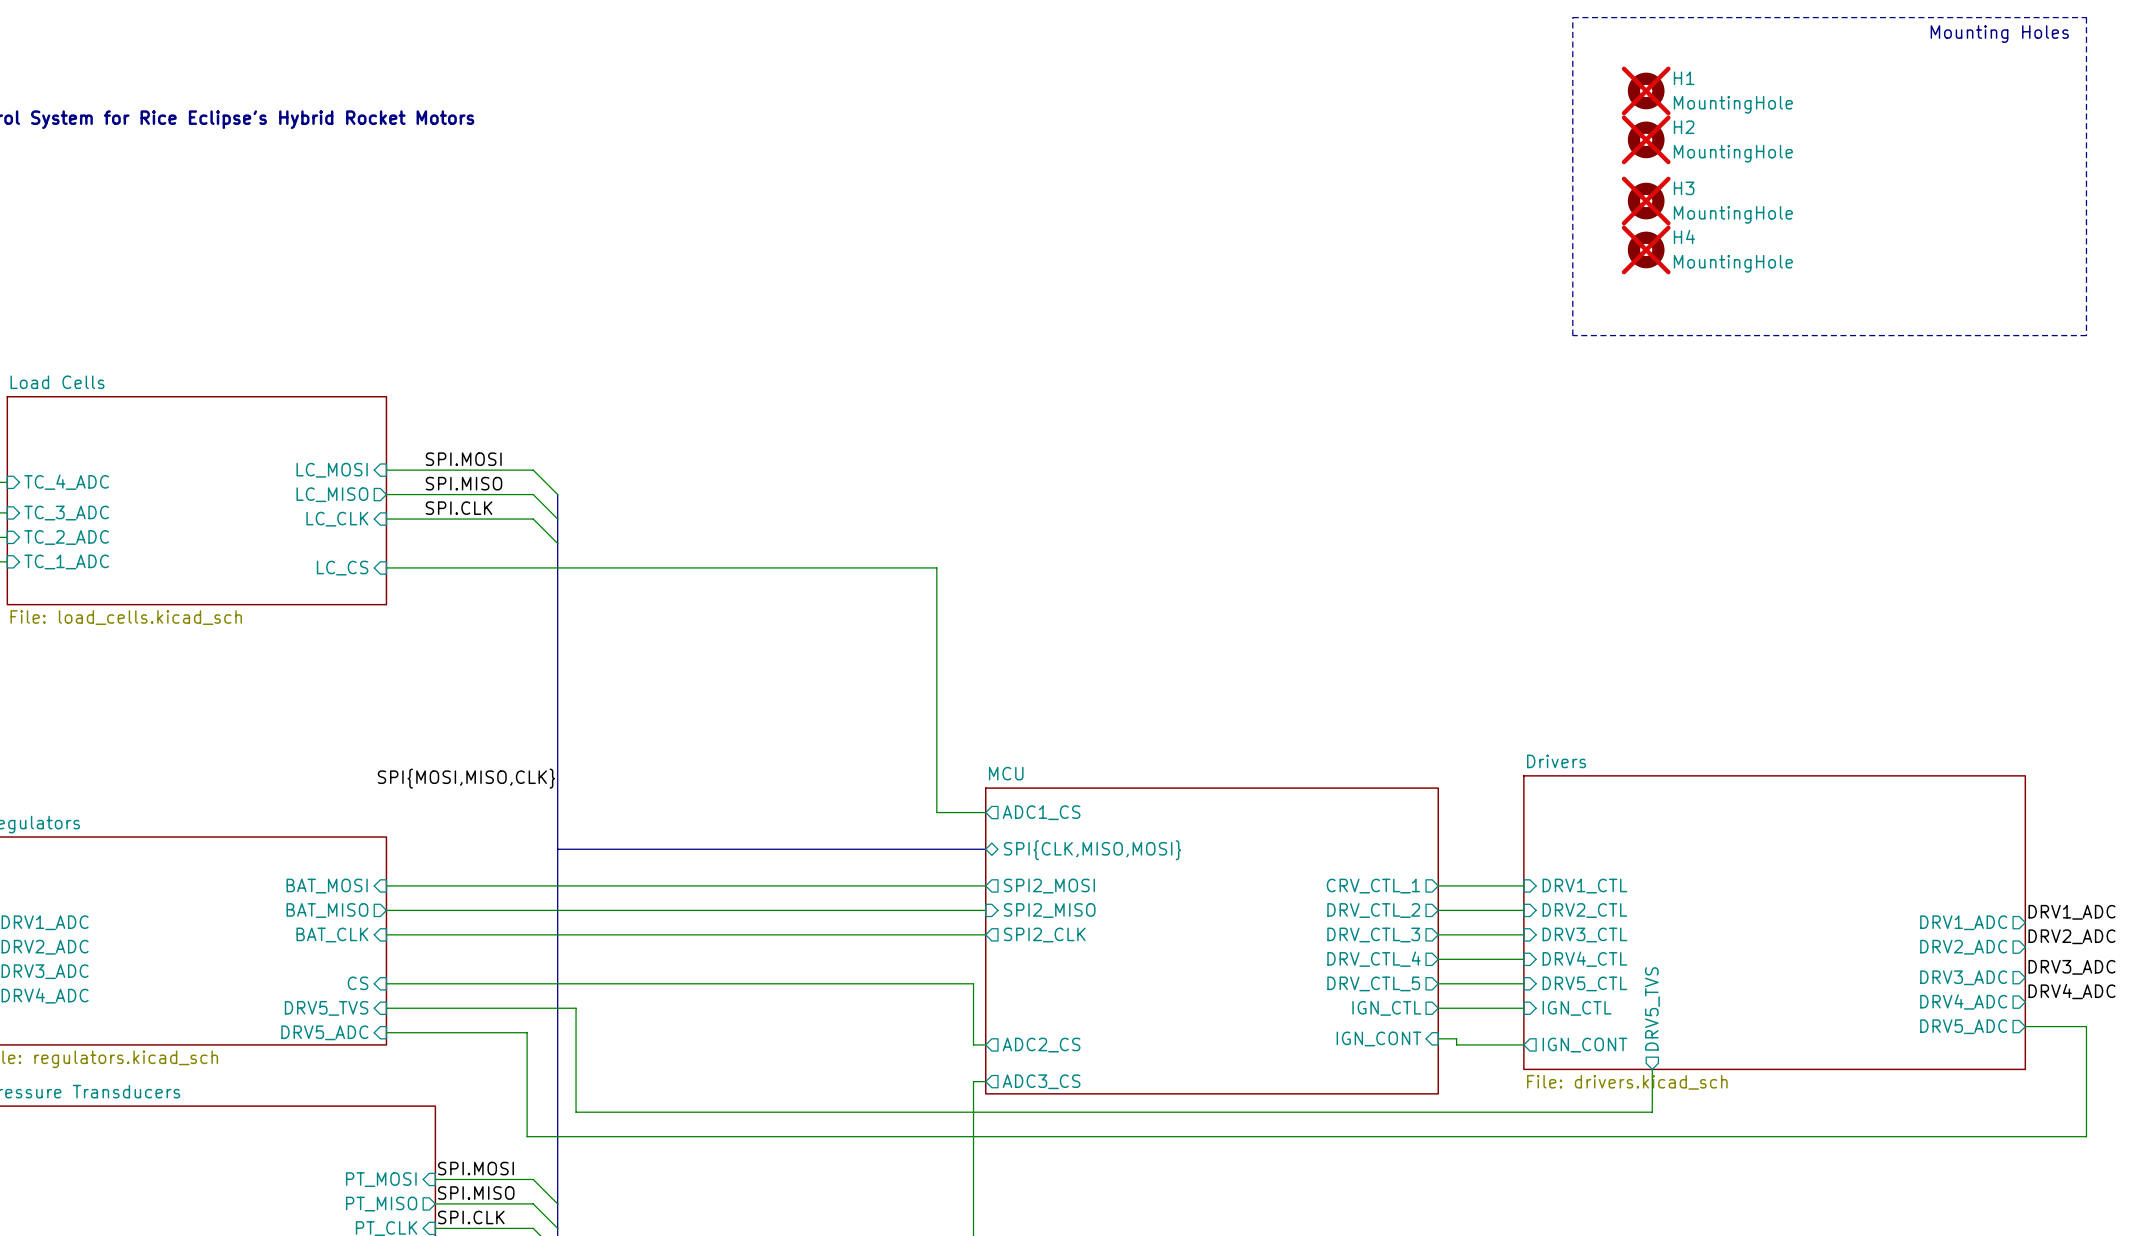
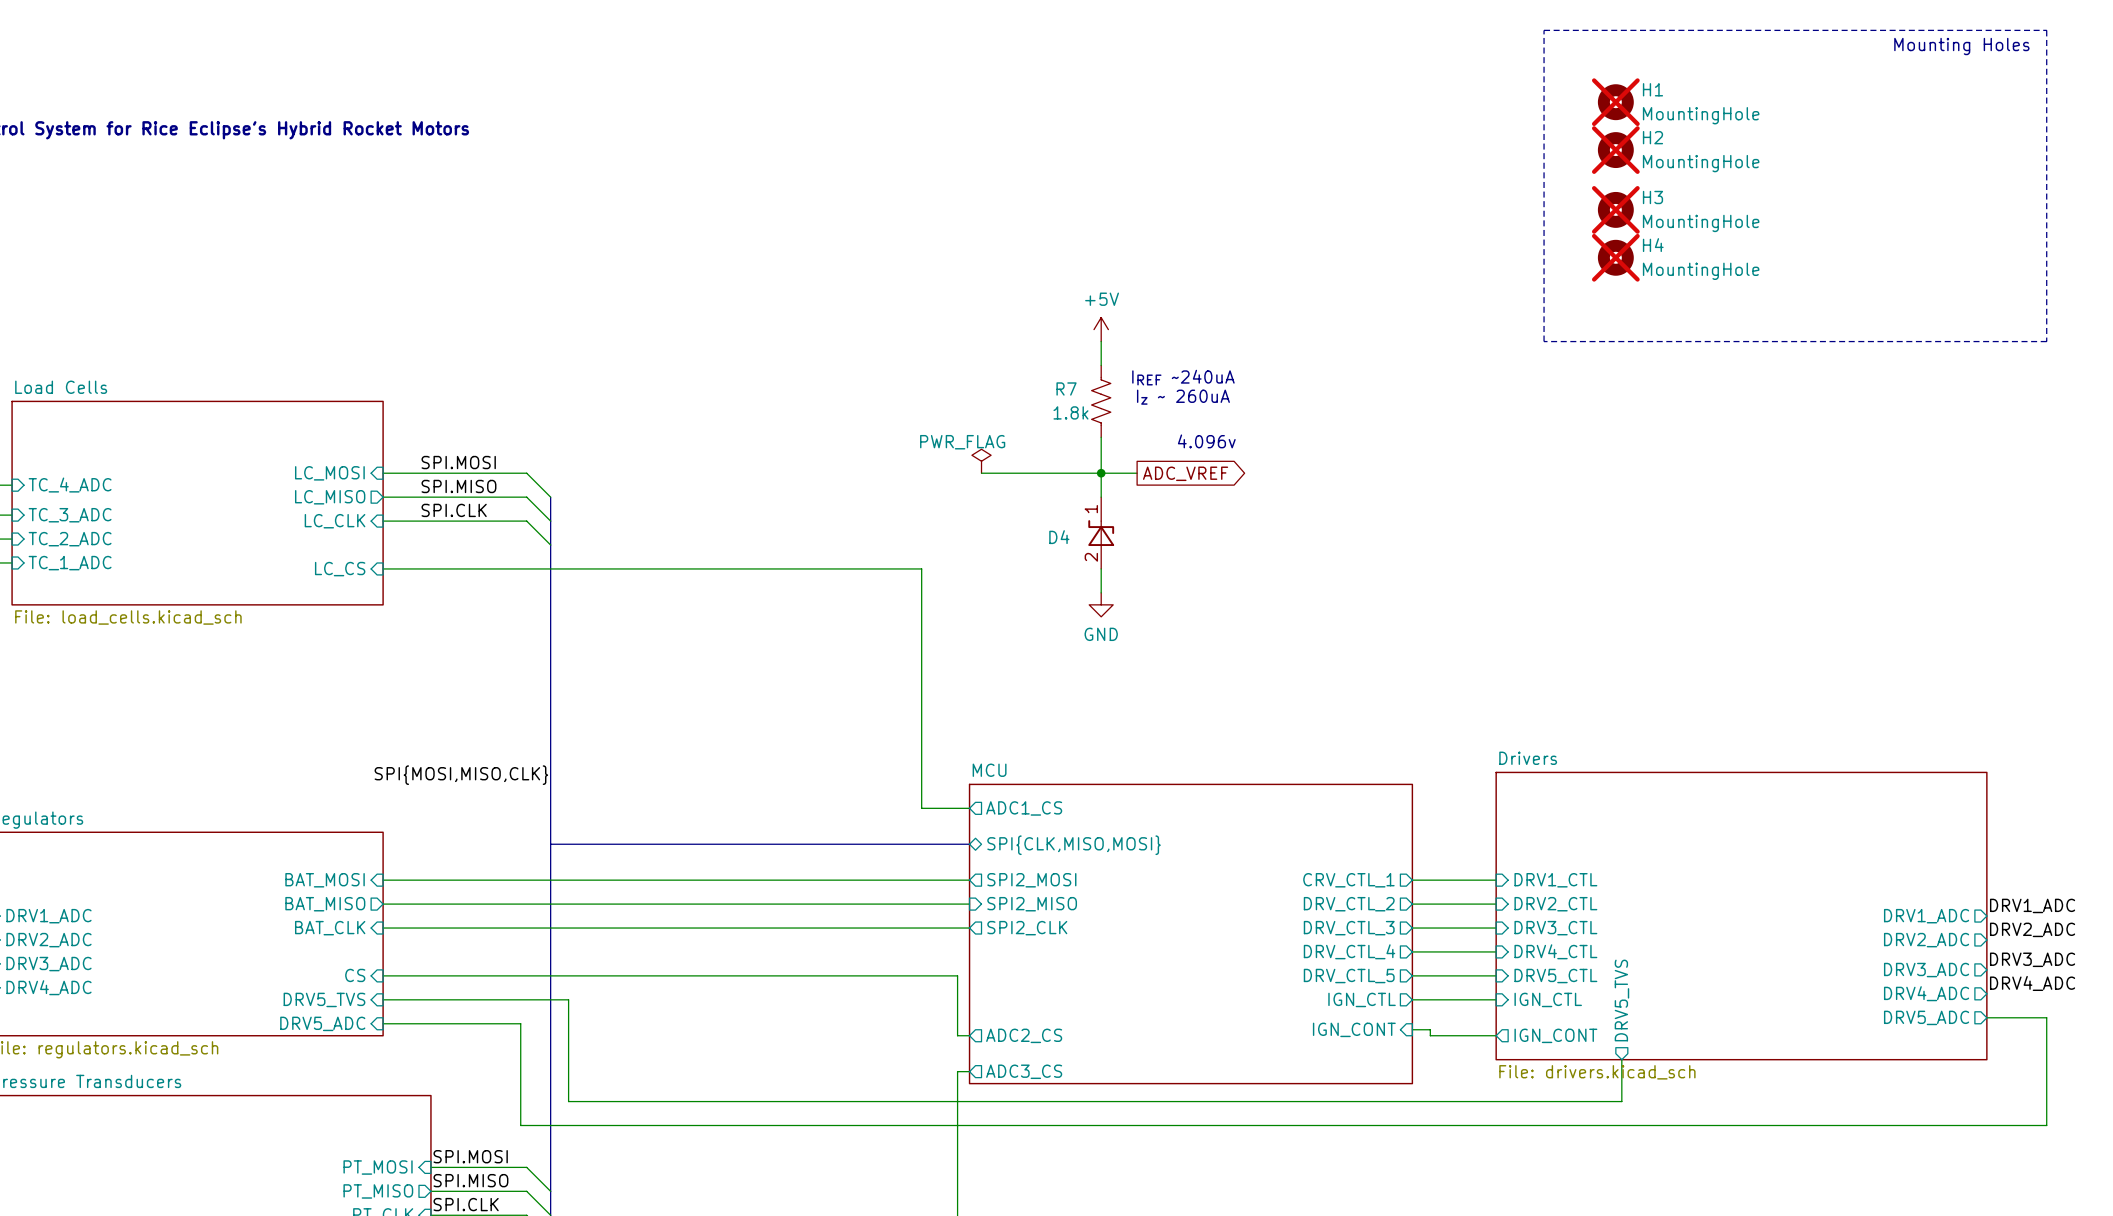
power symbol: none -> +5V (1101, 329)
wire: none -> (1101, 341) (1101, 365)
text: none -> IREF ~240uA (1183, 377)
text: none -> Iz ~ 260uA (1183, 397)
R7: none -> 1.8k (1101, 401)
wire: none -> (1101, 437) (1101, 497)
text: none -> 4.096v (1206, 441)
power symbol: none -> PWR_FLAG (981, 461)
wire: none -> (981, 473) (1137, 473)
junction: none -> (1101, 473)
global label: none -> ADC_VREF (1185, 473)
D4: none -> (1101, 533)
wire: none -> (1101, 568) (1101, 592)
power symbol: none -> GND (1101, 604)

